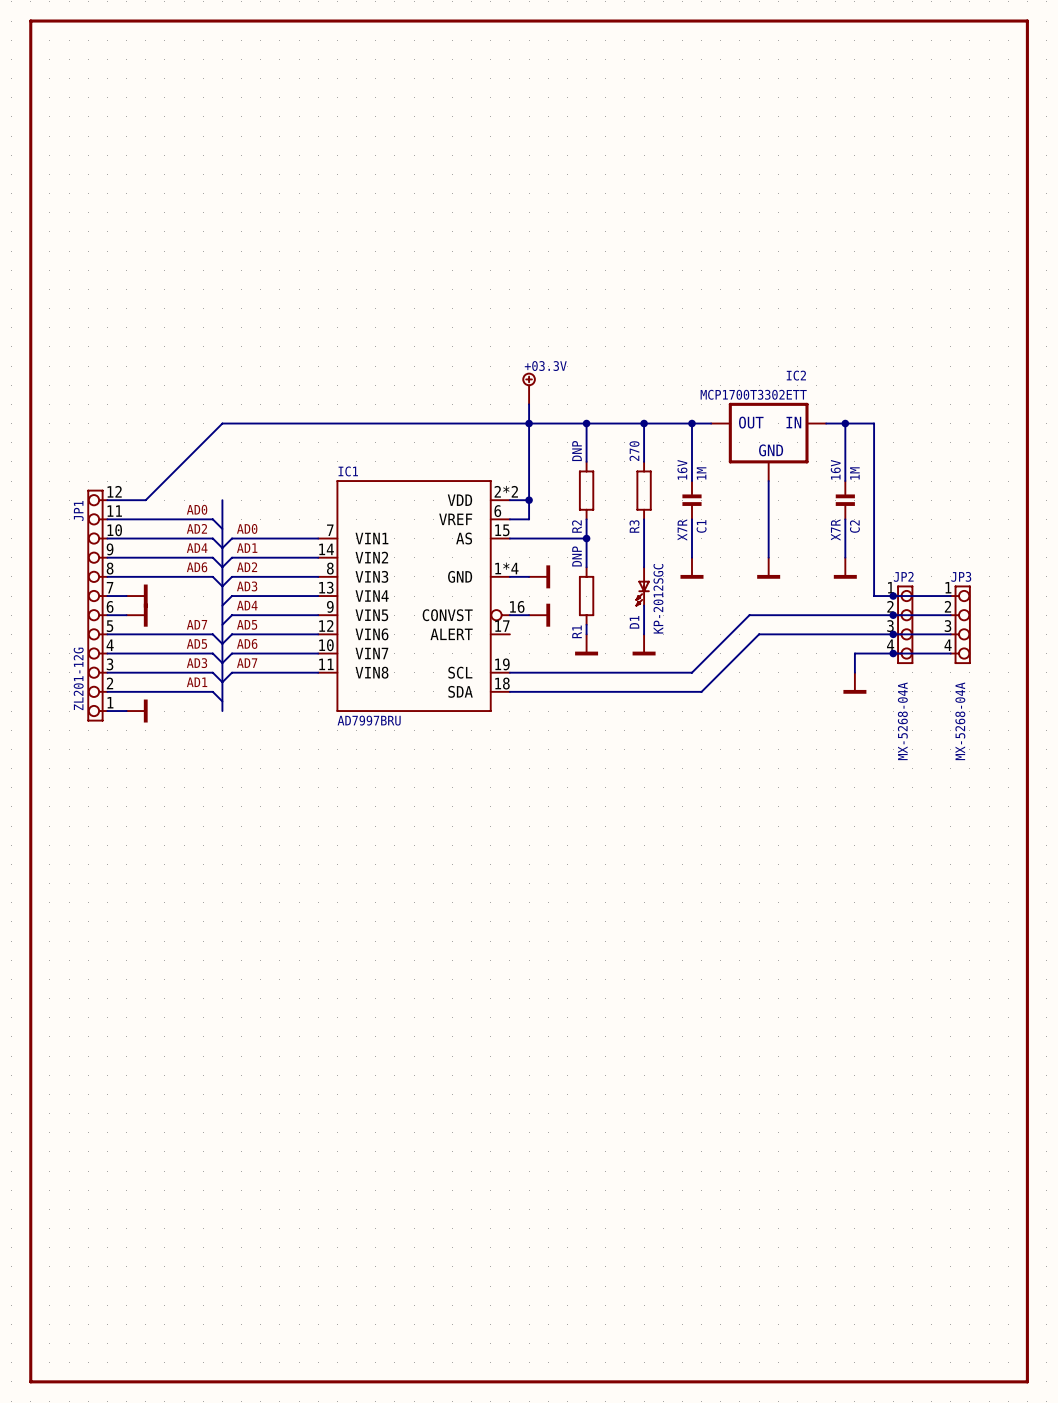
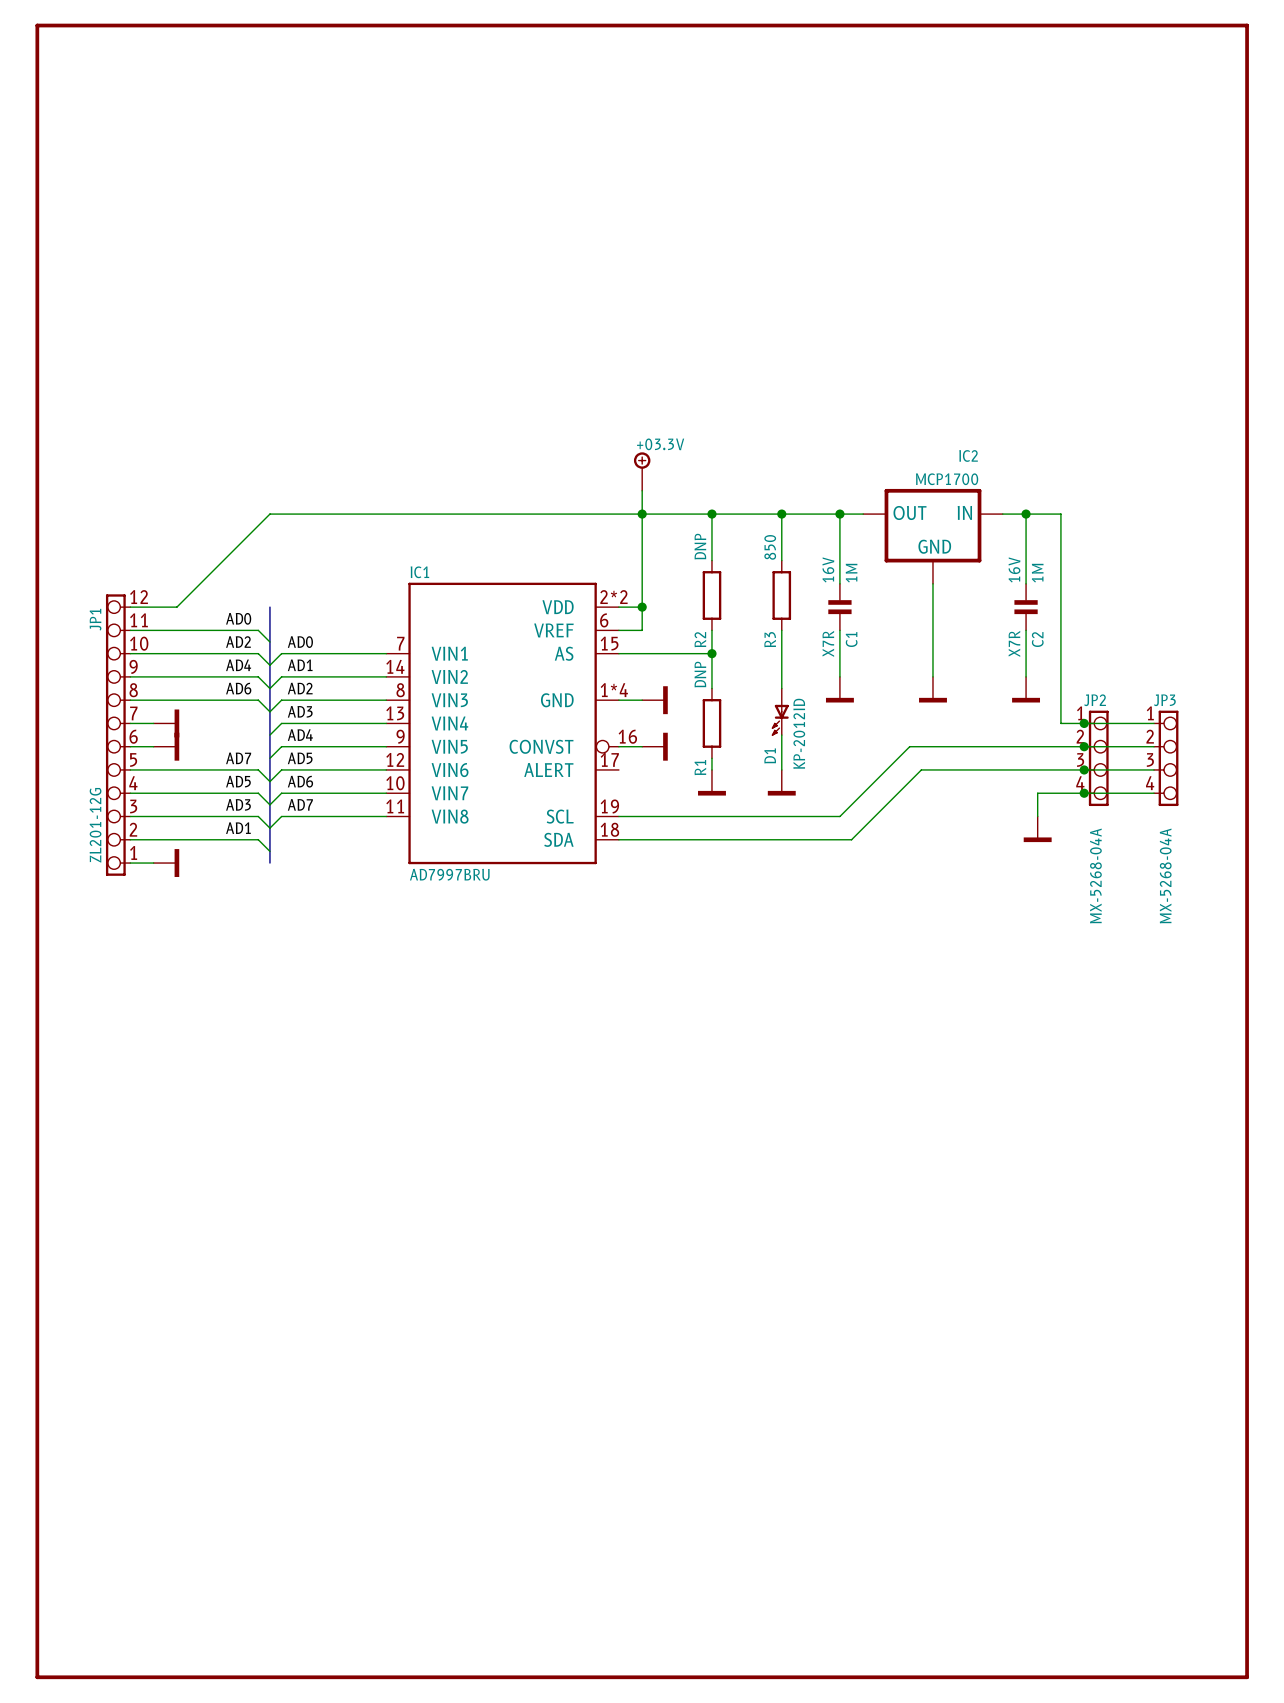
IC2 value: MCP1700T3302ETT (753, 394) -> MCP1700 (947, 479)
R3 value: 270 (634, 451) -> 850 (770, 547)
D1 value: KP-2012SGC (658, 598) -> KP-2012ID (799, 733)

